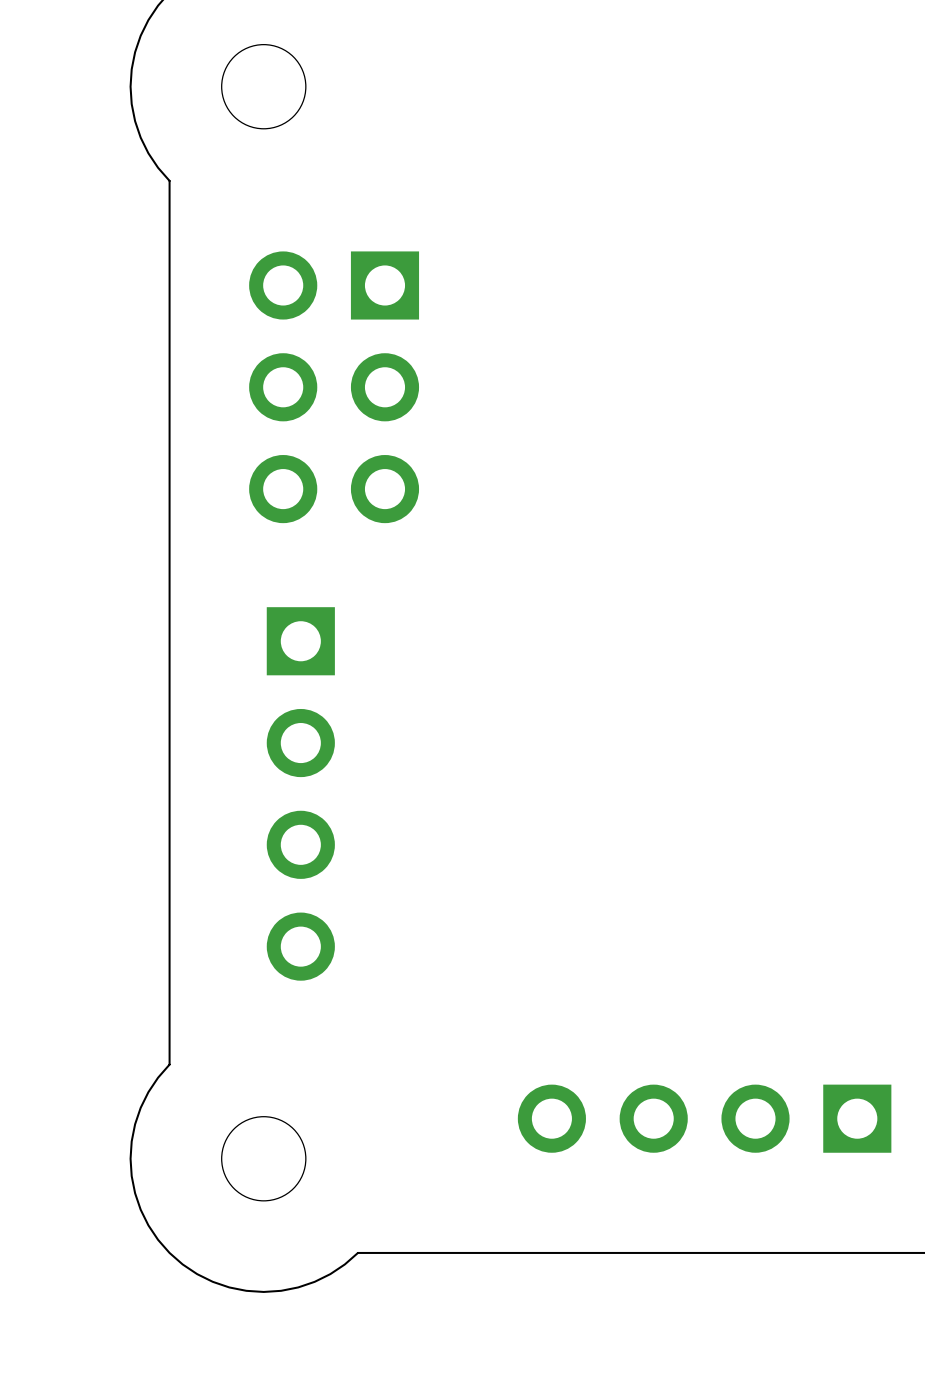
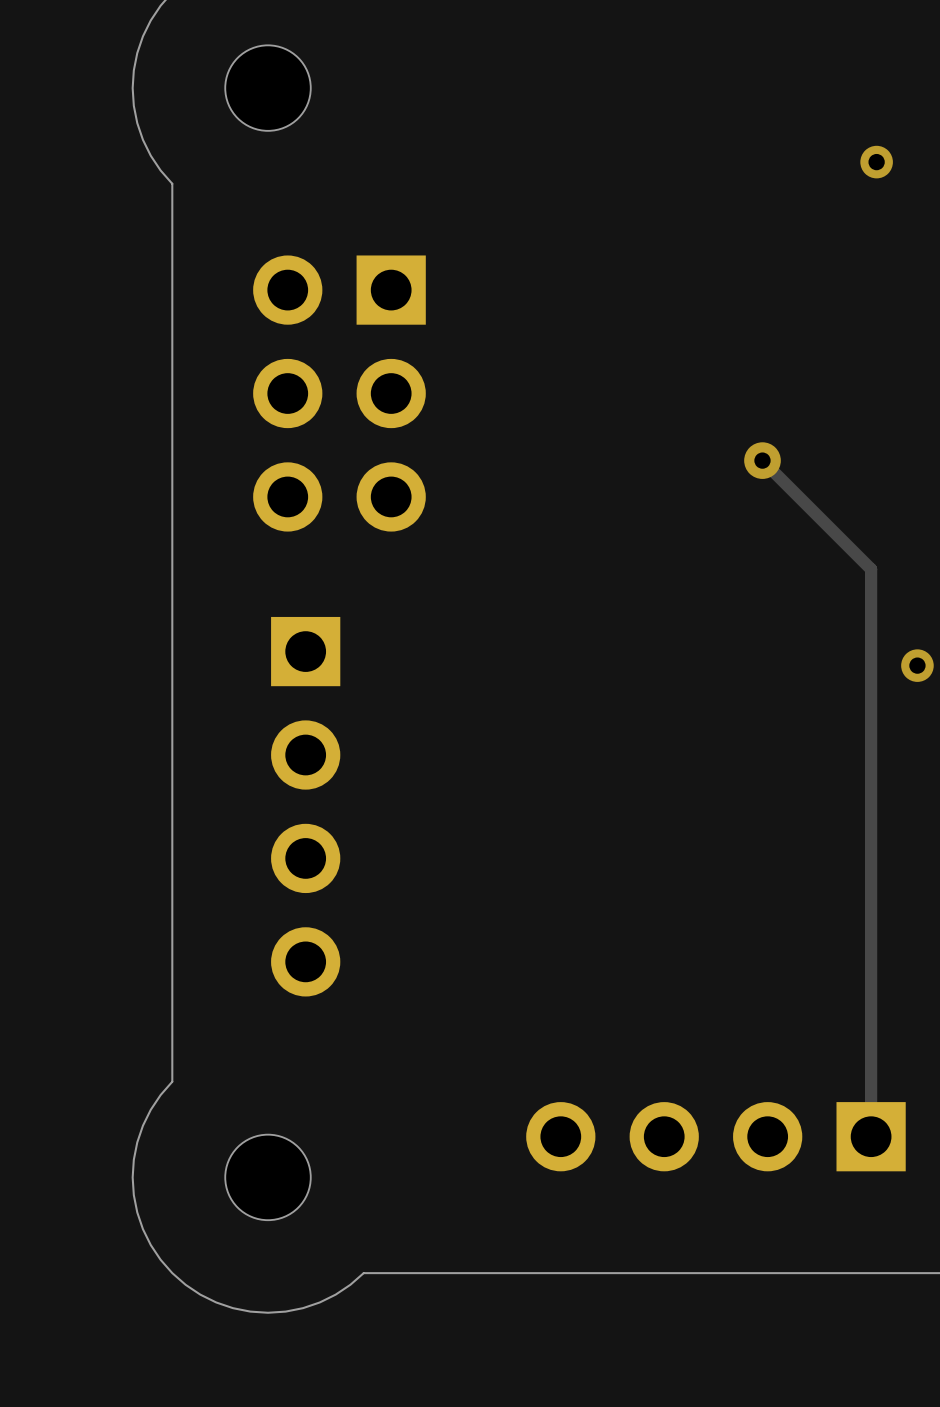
via: none -> (876, 162)
track: none -> (762, 460) (871, 569) (871, 1136)
via: none -> (762, 460)
via: none -> (917, 665)

